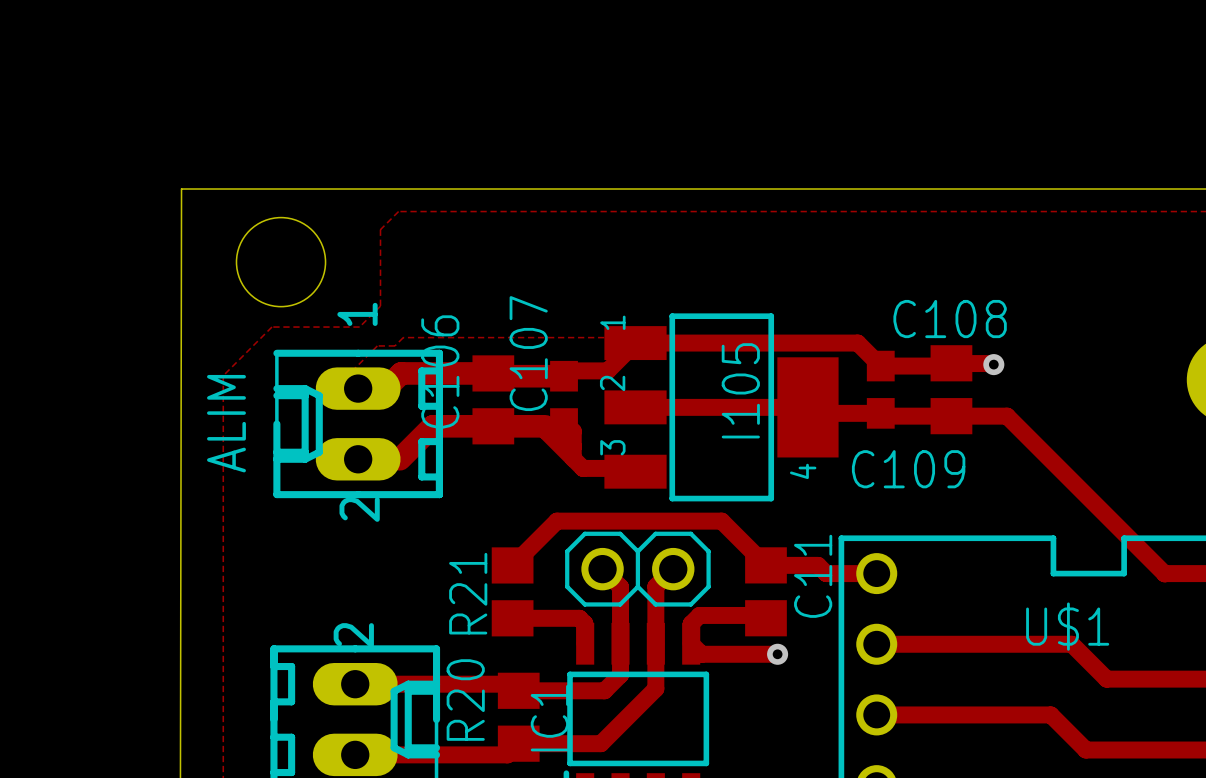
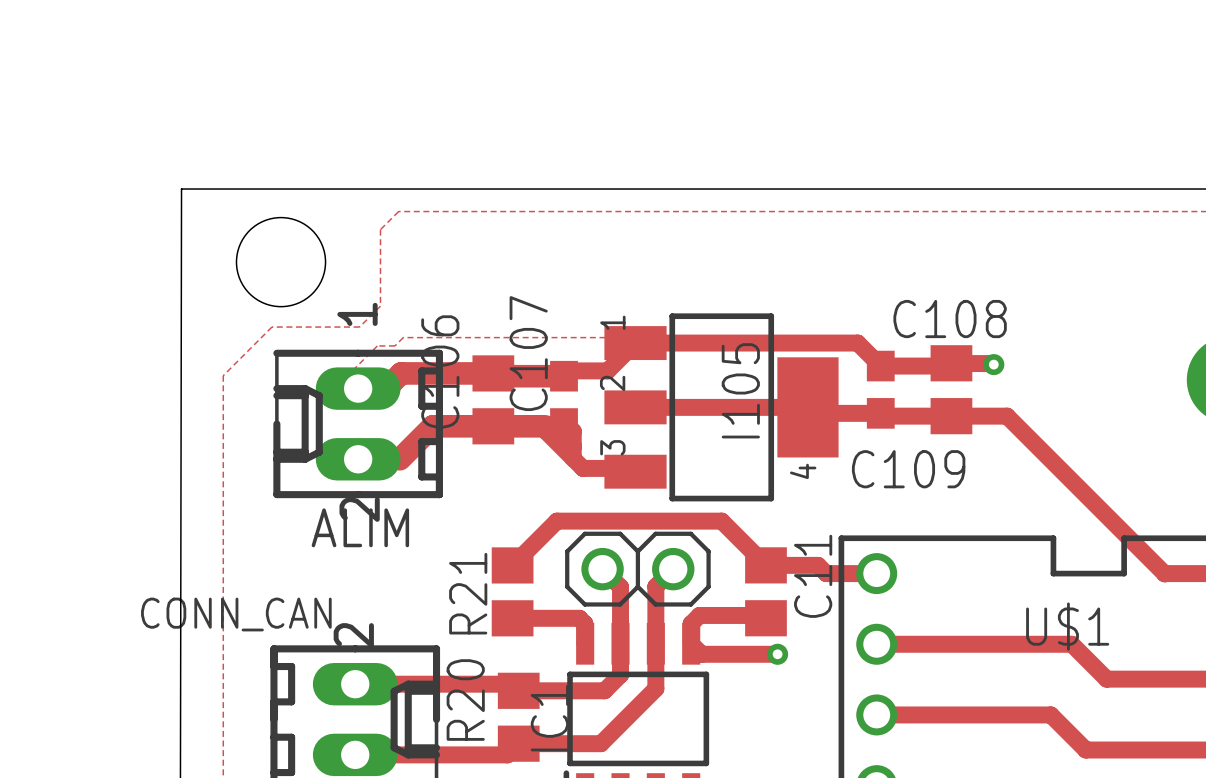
ALIM name rotation: 0° (226, 423) -> 90° clockwise (360, 527)
ALIM name position: ALIM (226, 423) -> ALIM (360, 527)
CONN_CAN name: none -> CONN_CAN (236, 614)

